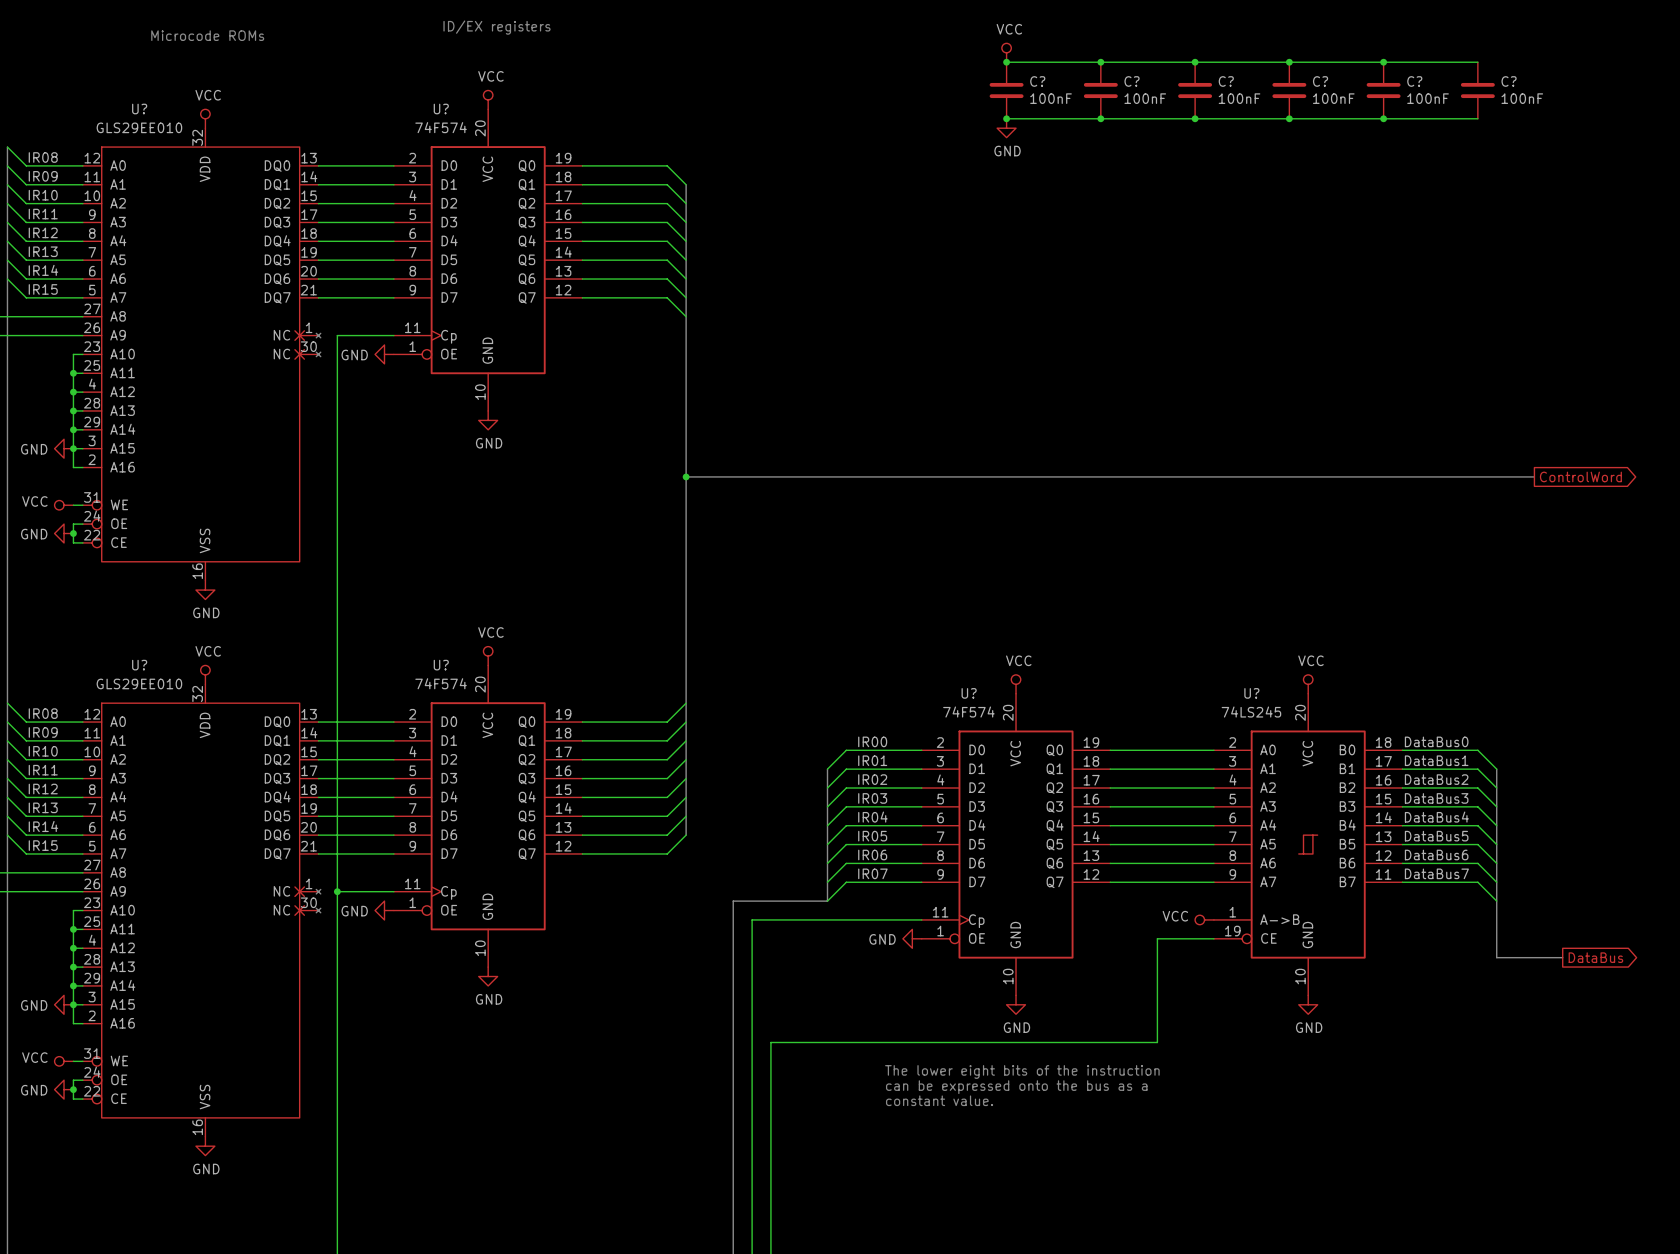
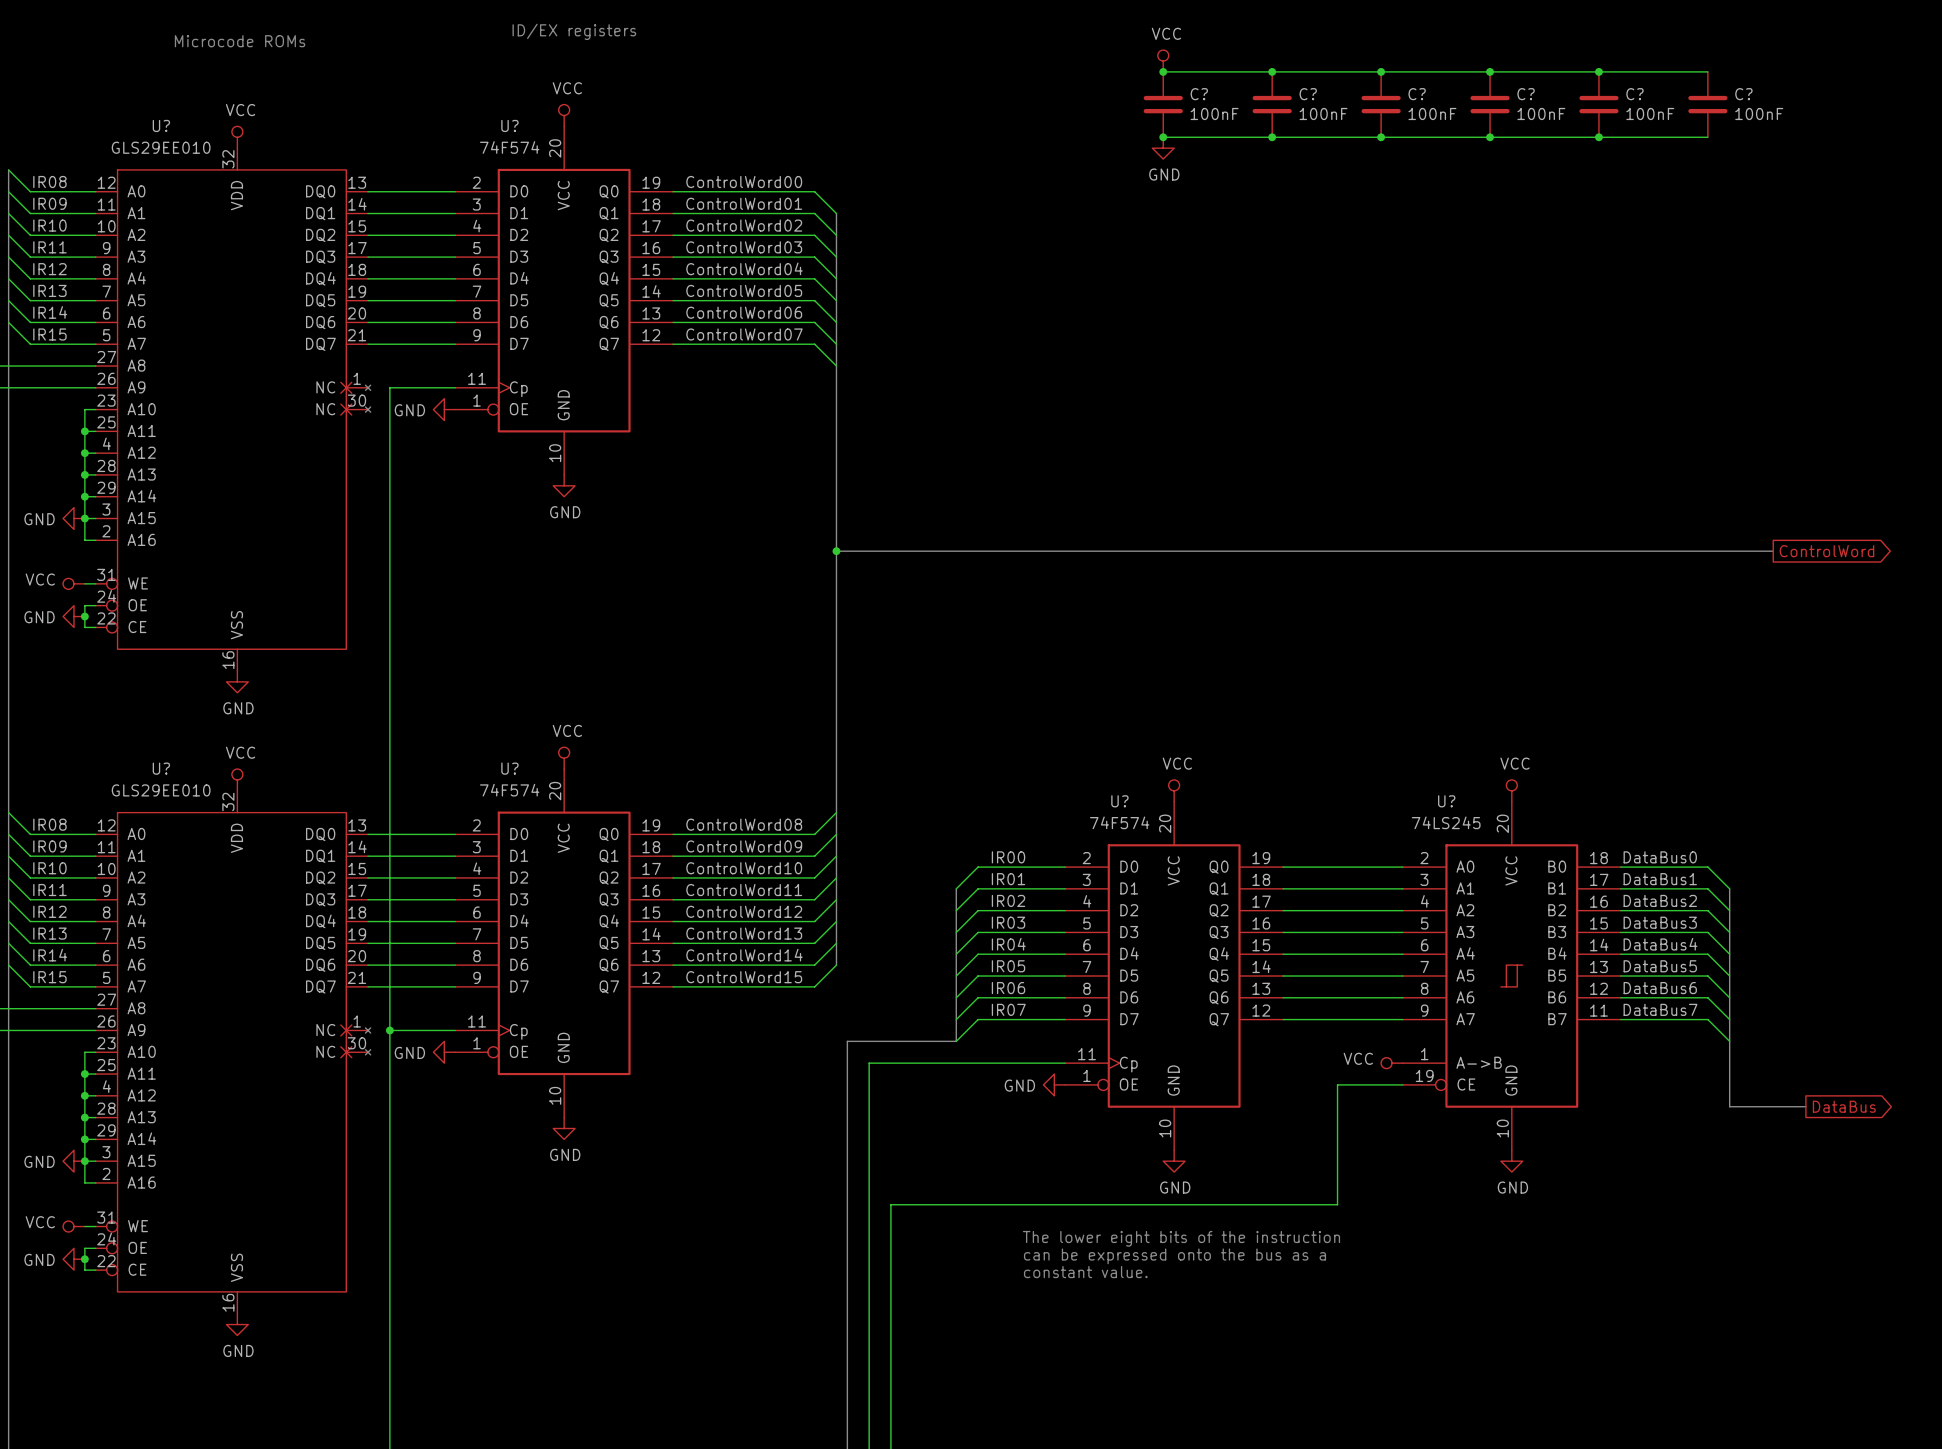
label: none -> ControlWord00 (744, 182)
wire: (667, 165) (686, 184) -> (771, 191) (814, 191) (836, 213)
label: none -> ControlWord01 (744, 203)
wire: (667, 184) (686, 203) -> (771, 213) (814, 213) (836, 235)
bus: (686, 184) (686, 835) -> (836, 213) (836, 965)
label: none -> ControlWord02 (744, 225)
wire: (667, 203) (686, 222) -> (771, 235) (814, 235) (836, 257)
label: none -> ControlWord03 (744, 247)
wire: (667, 222) (686, 241) -> (771, 257) (814, 257) (836, 278)
label: none -> ControlWord04 (744, 268)
wire: (667, 241) (686, 260) -> (771, 278) (814, 278) (836, 300)
label: none -> ControlWord05 (744, 290)
wire: (667, 260) (686, 279) -> (771, 300) (814, 300) (836, 322)
label: none -> ControlWord06 (744, 312)
wire: (667, 279) (686, 297) -> (771, 322) (814, 322) (836, 344)
label: none -> ControlWord07 (744, 334)
wire: (667, 297) (686, 316) -> (771, 344) (814, 344) (836, 366)
bus: (686, 476) (723, 476) -> none
junction position: (686, 476) -> (836, 551)
wire: (686, 703) (667, 722) -> (836, 812) (814, 834) (771, 834)
label: none -> ControlWord08 (744, 824)
wire: (686, 722) (667, 740) -> (836, 834) (814, 856) (771, 856)
label: none -> ControlWord09 (744, 846)
wire: (686, 740) (667, 759) -> (836, 856) (814, 877) (771, 877)
label: none -> ControlWord10 (744, 868)
wire: (686, 759) (667, 778) -> (836, 877) (814, 899) (771, 899)
label: none -> ControlWord11 (744, 890)
wire: (686, 778) (667, 797) -> (836, 899) (814, 921) (771, 921)
label: none -> ControlWord12 (744, 911)
wire: (686, 797) (667, 816) -> (836, 921) (814, 943) (771, 943)
label: none -> ControlWord13 (744, 933)
wire: (686, 816) (667, 835) -> (836, 943) (814, 965) (771, 965)
label: none -> ControlWord14 (744, 955)
wire: (686, 835) (667, 853) -> (836, 965) (814, 986) (771, 986)
label: none -> ControlWord15 (744, 977)

